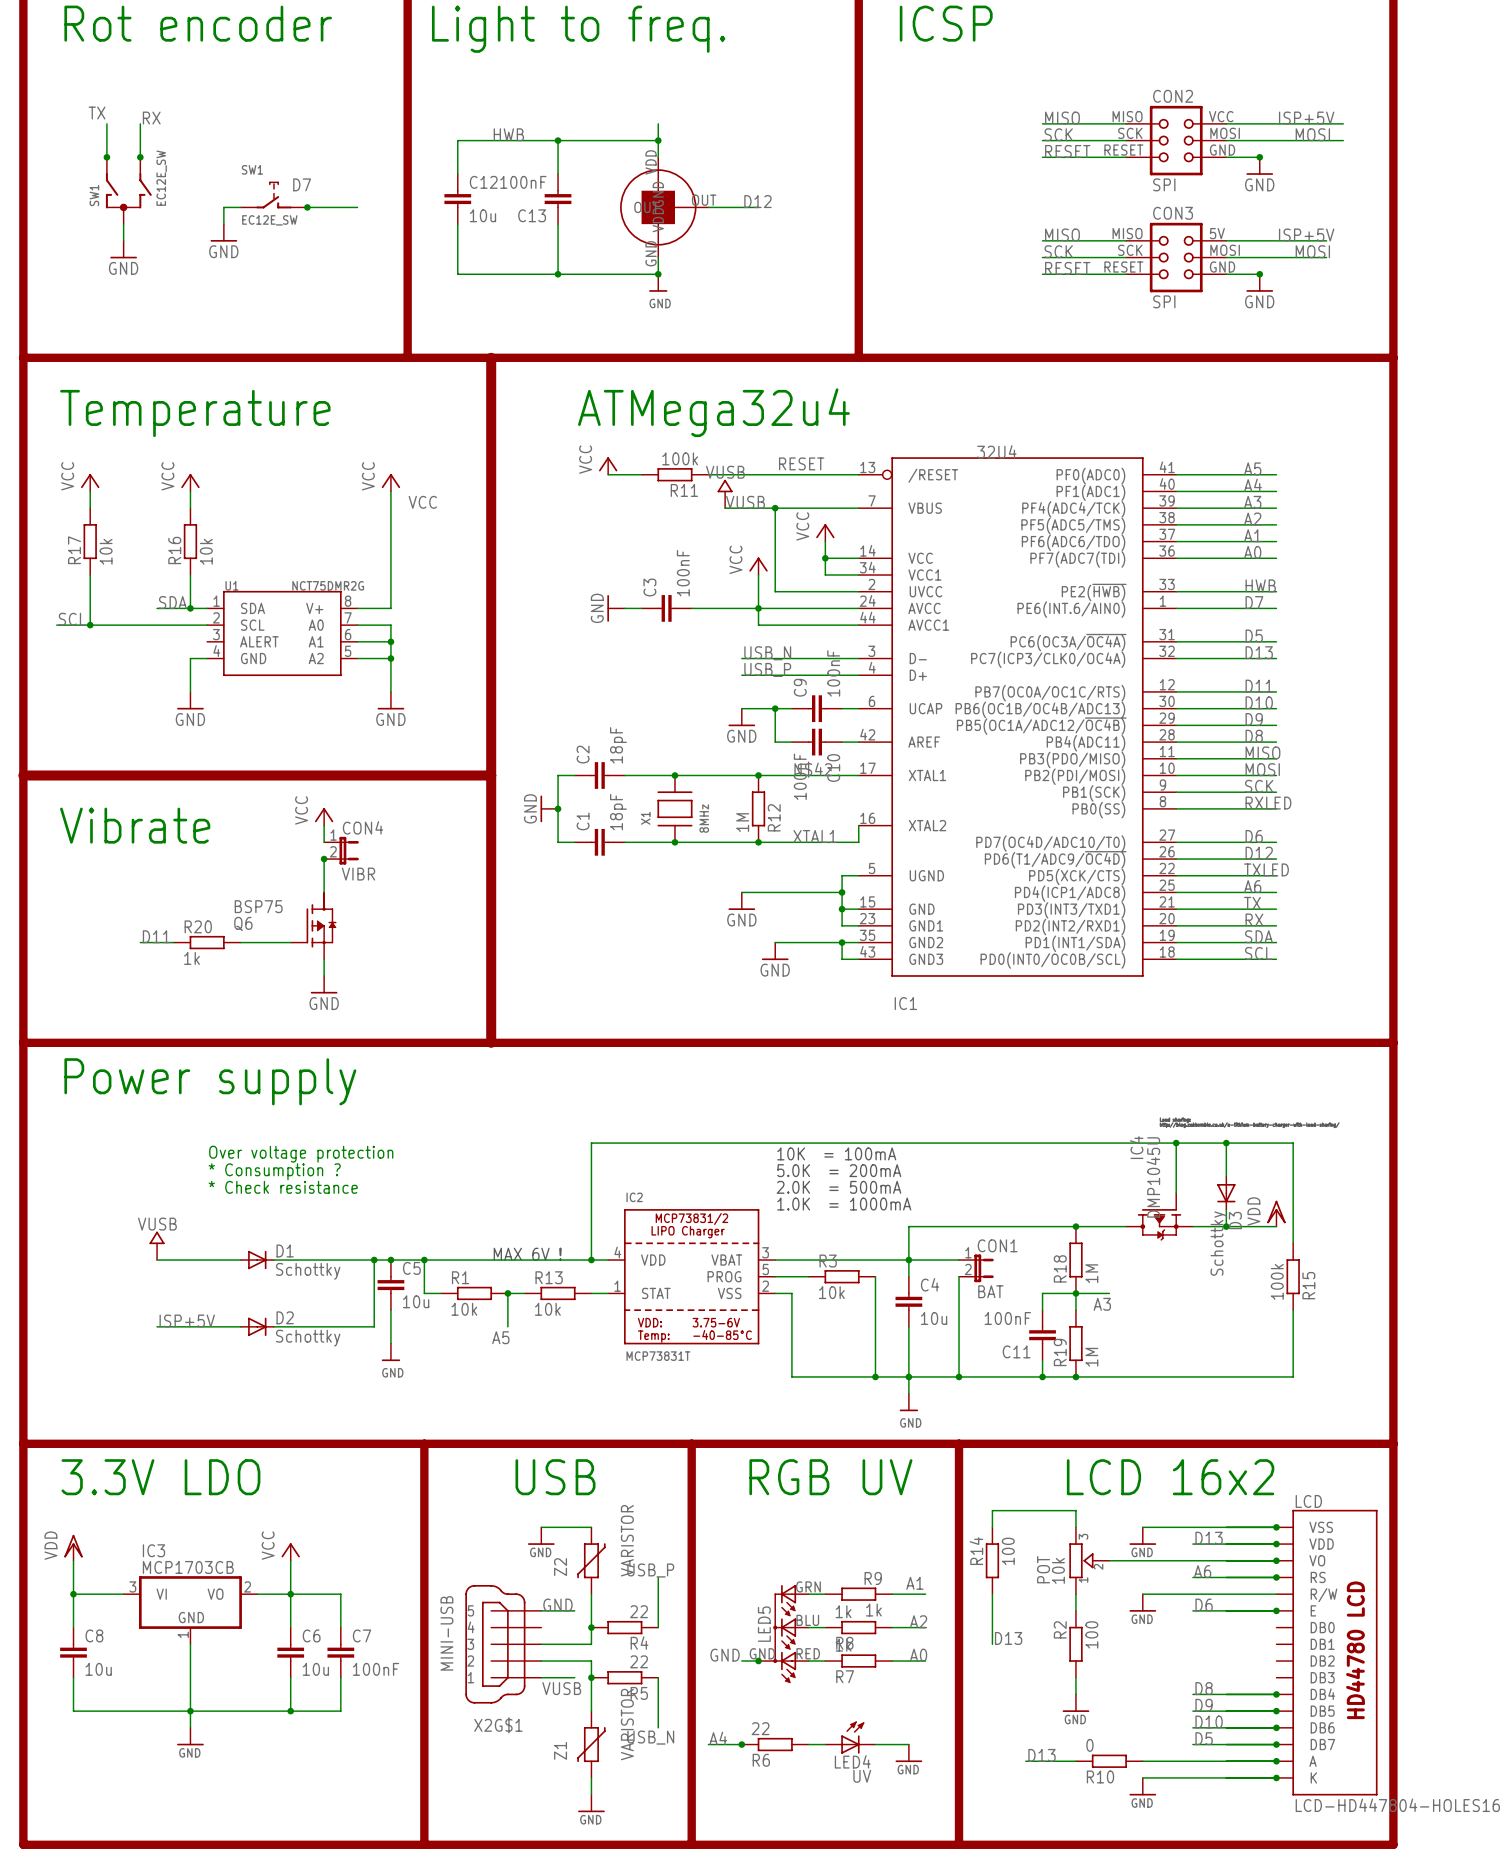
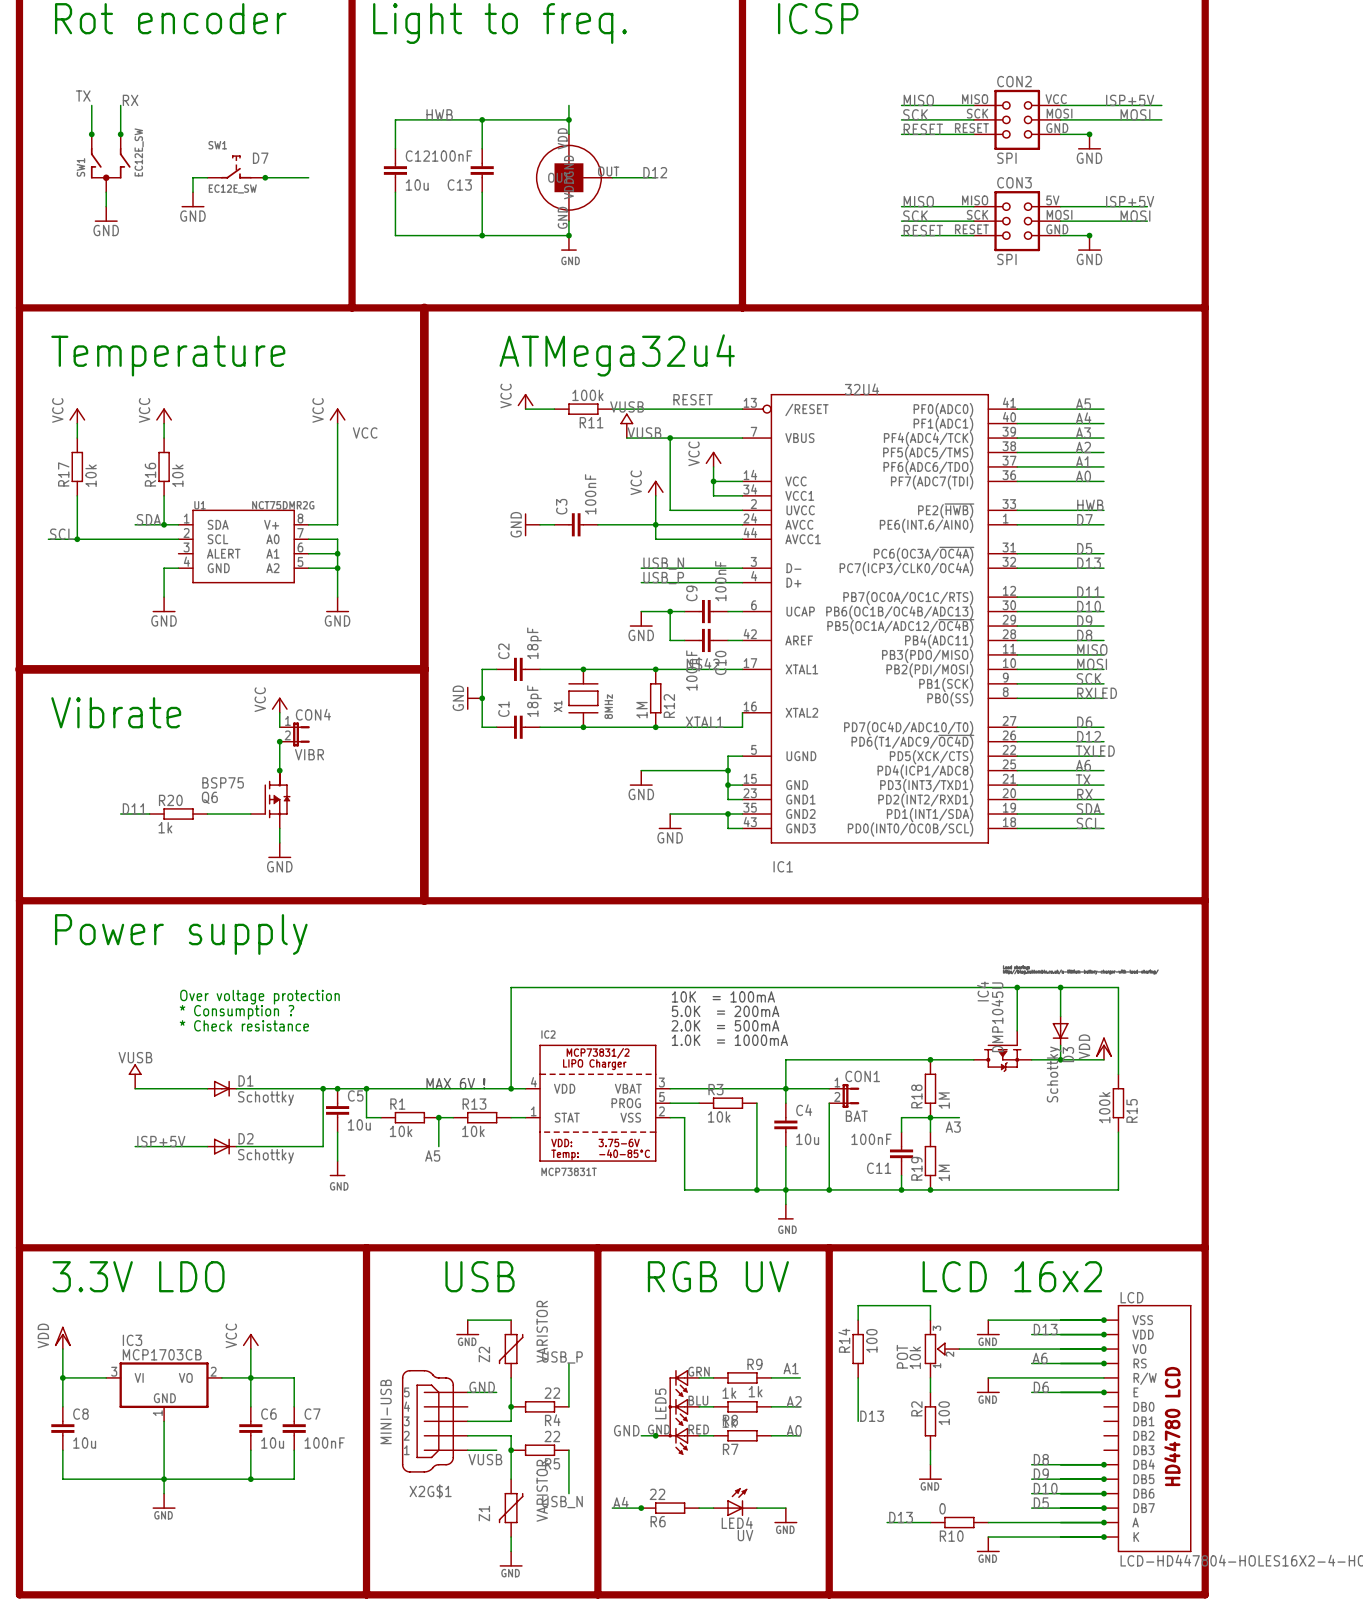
junction: none -> (279, 770)

